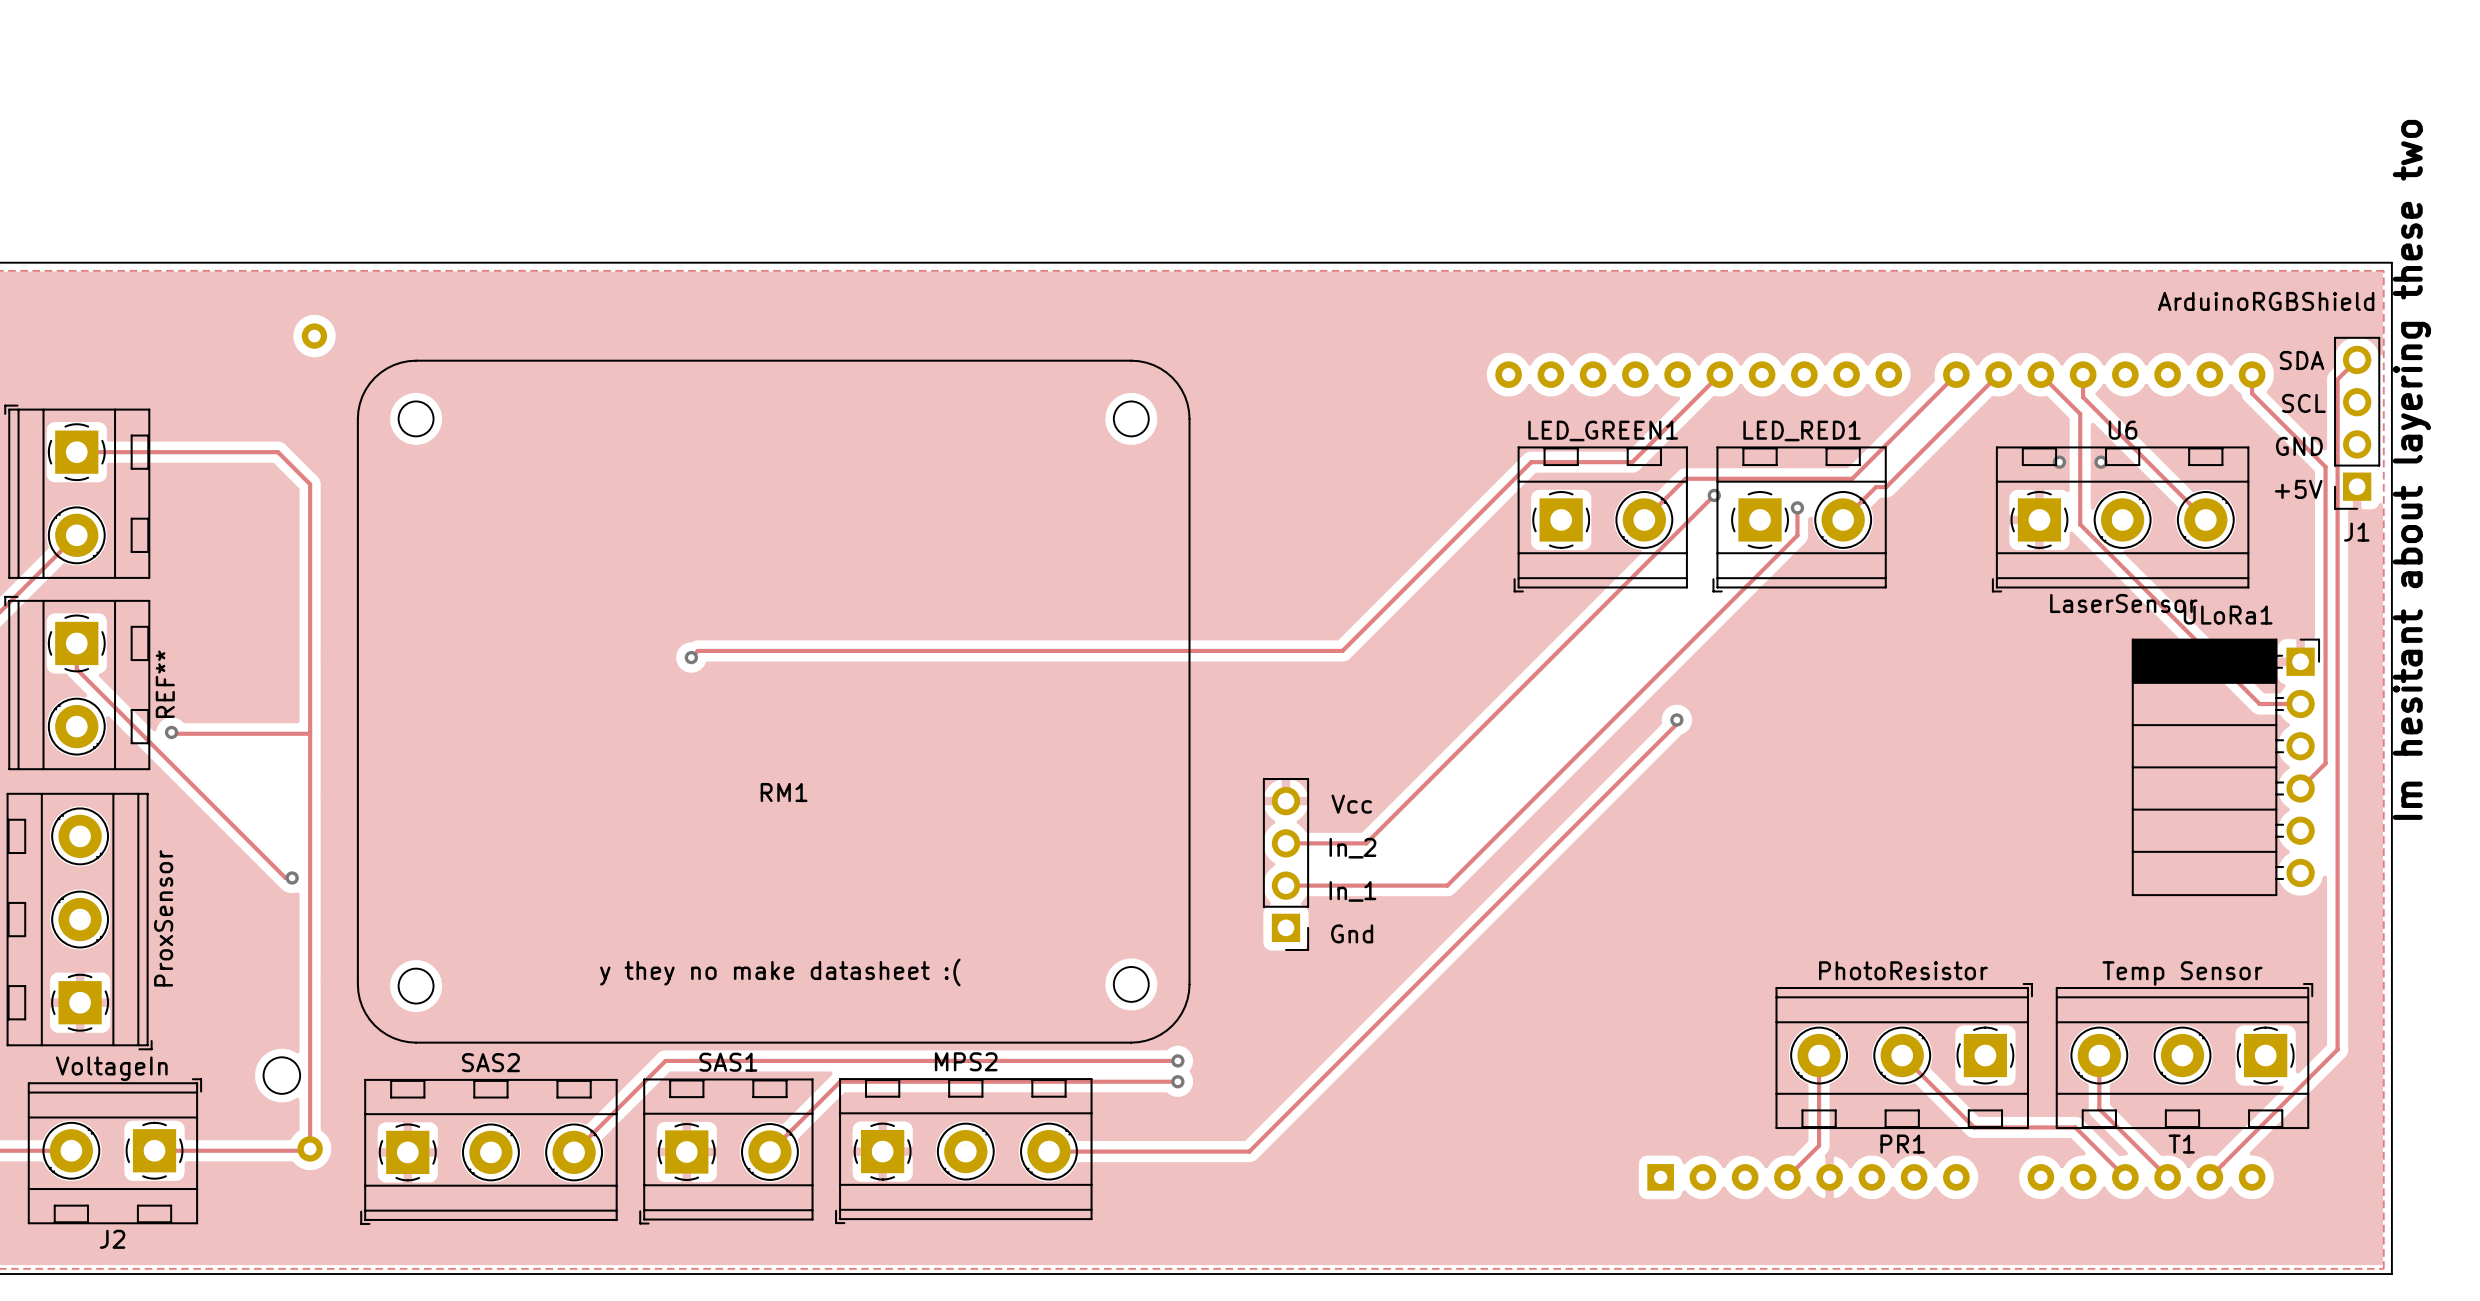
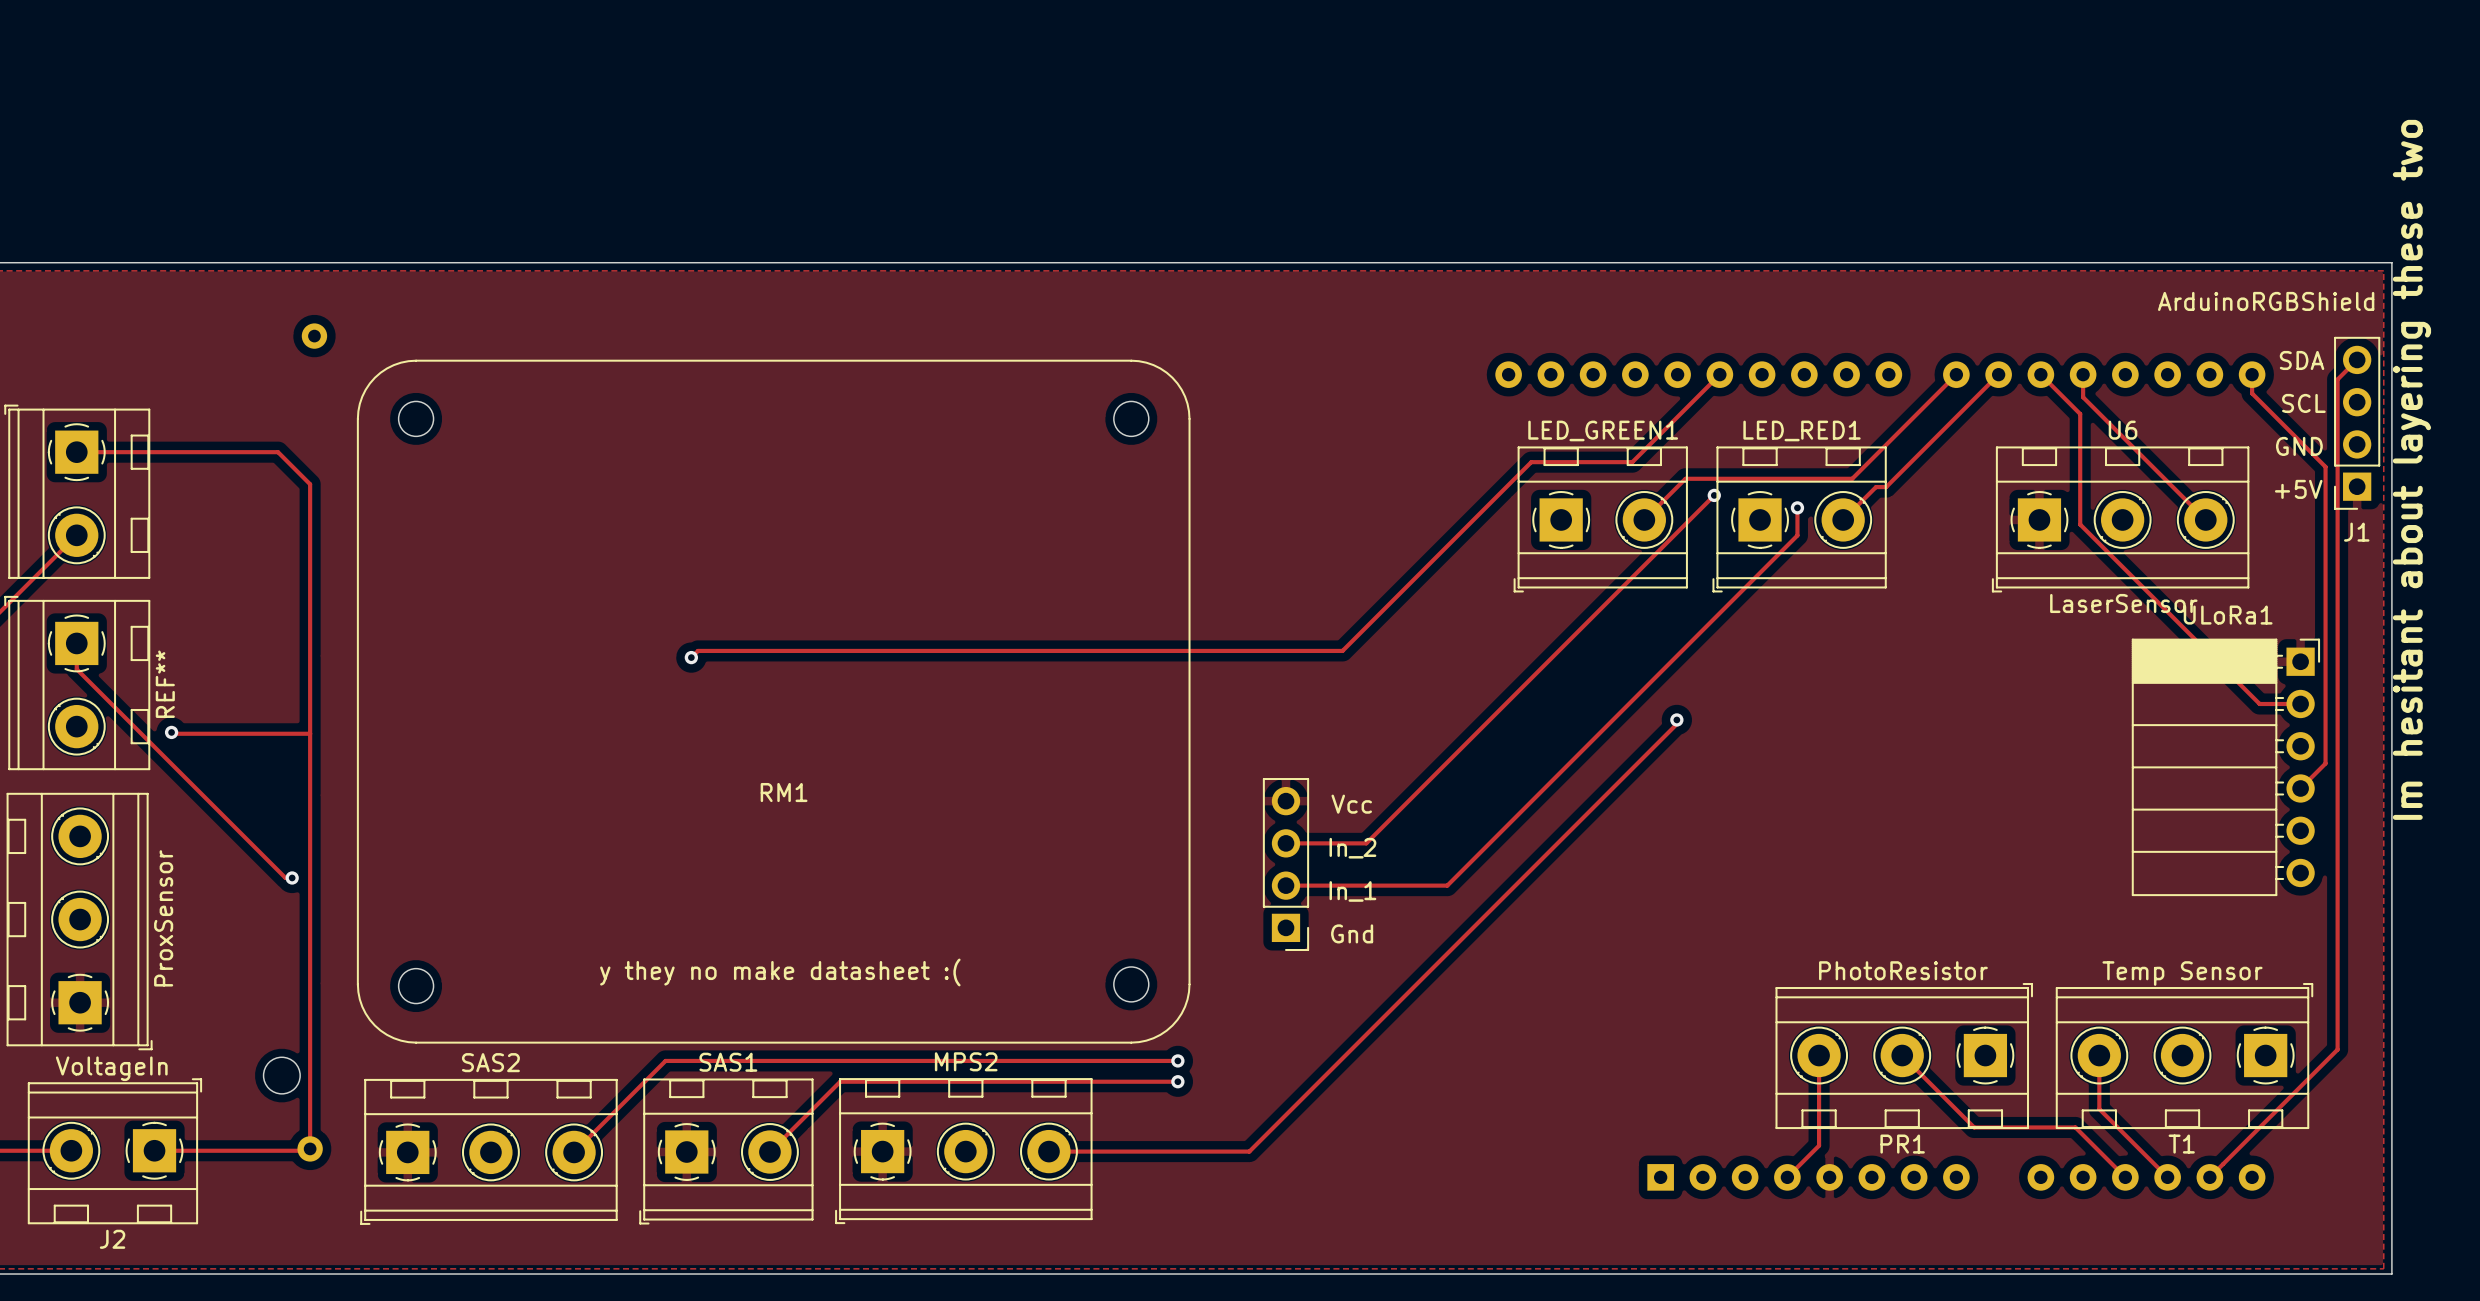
via: (2059, 462) -> none
via: (2101, 462) -> none

